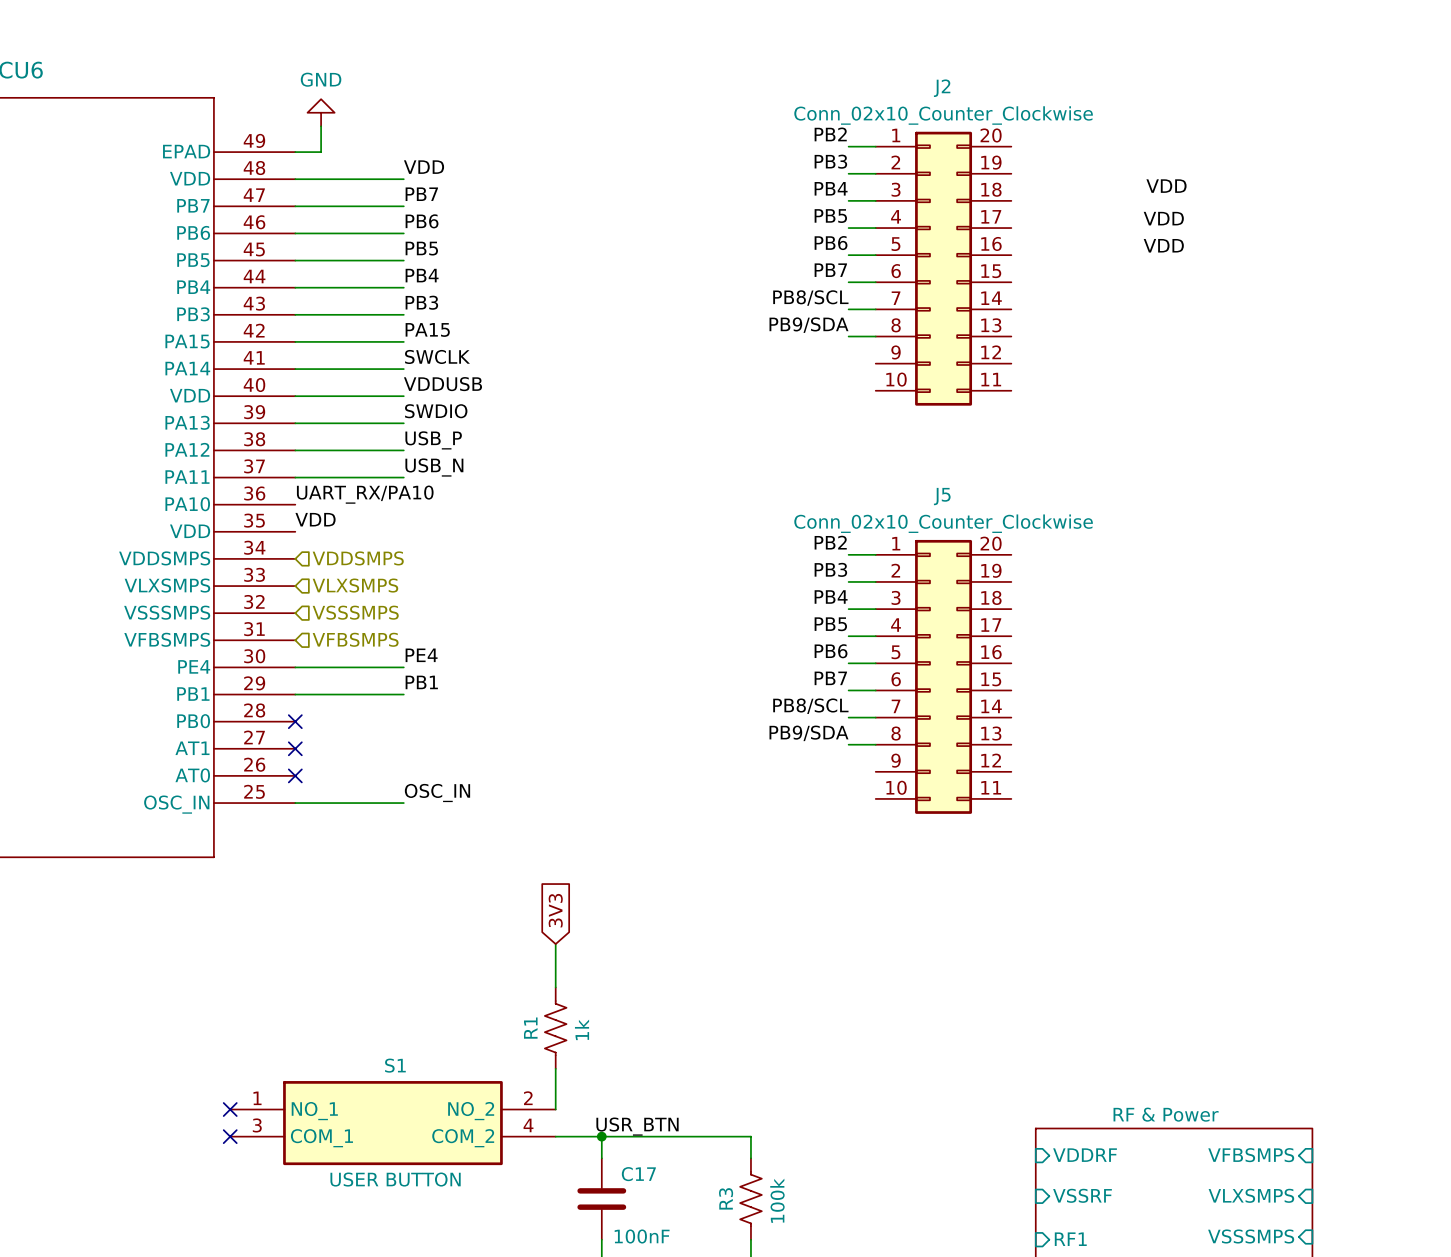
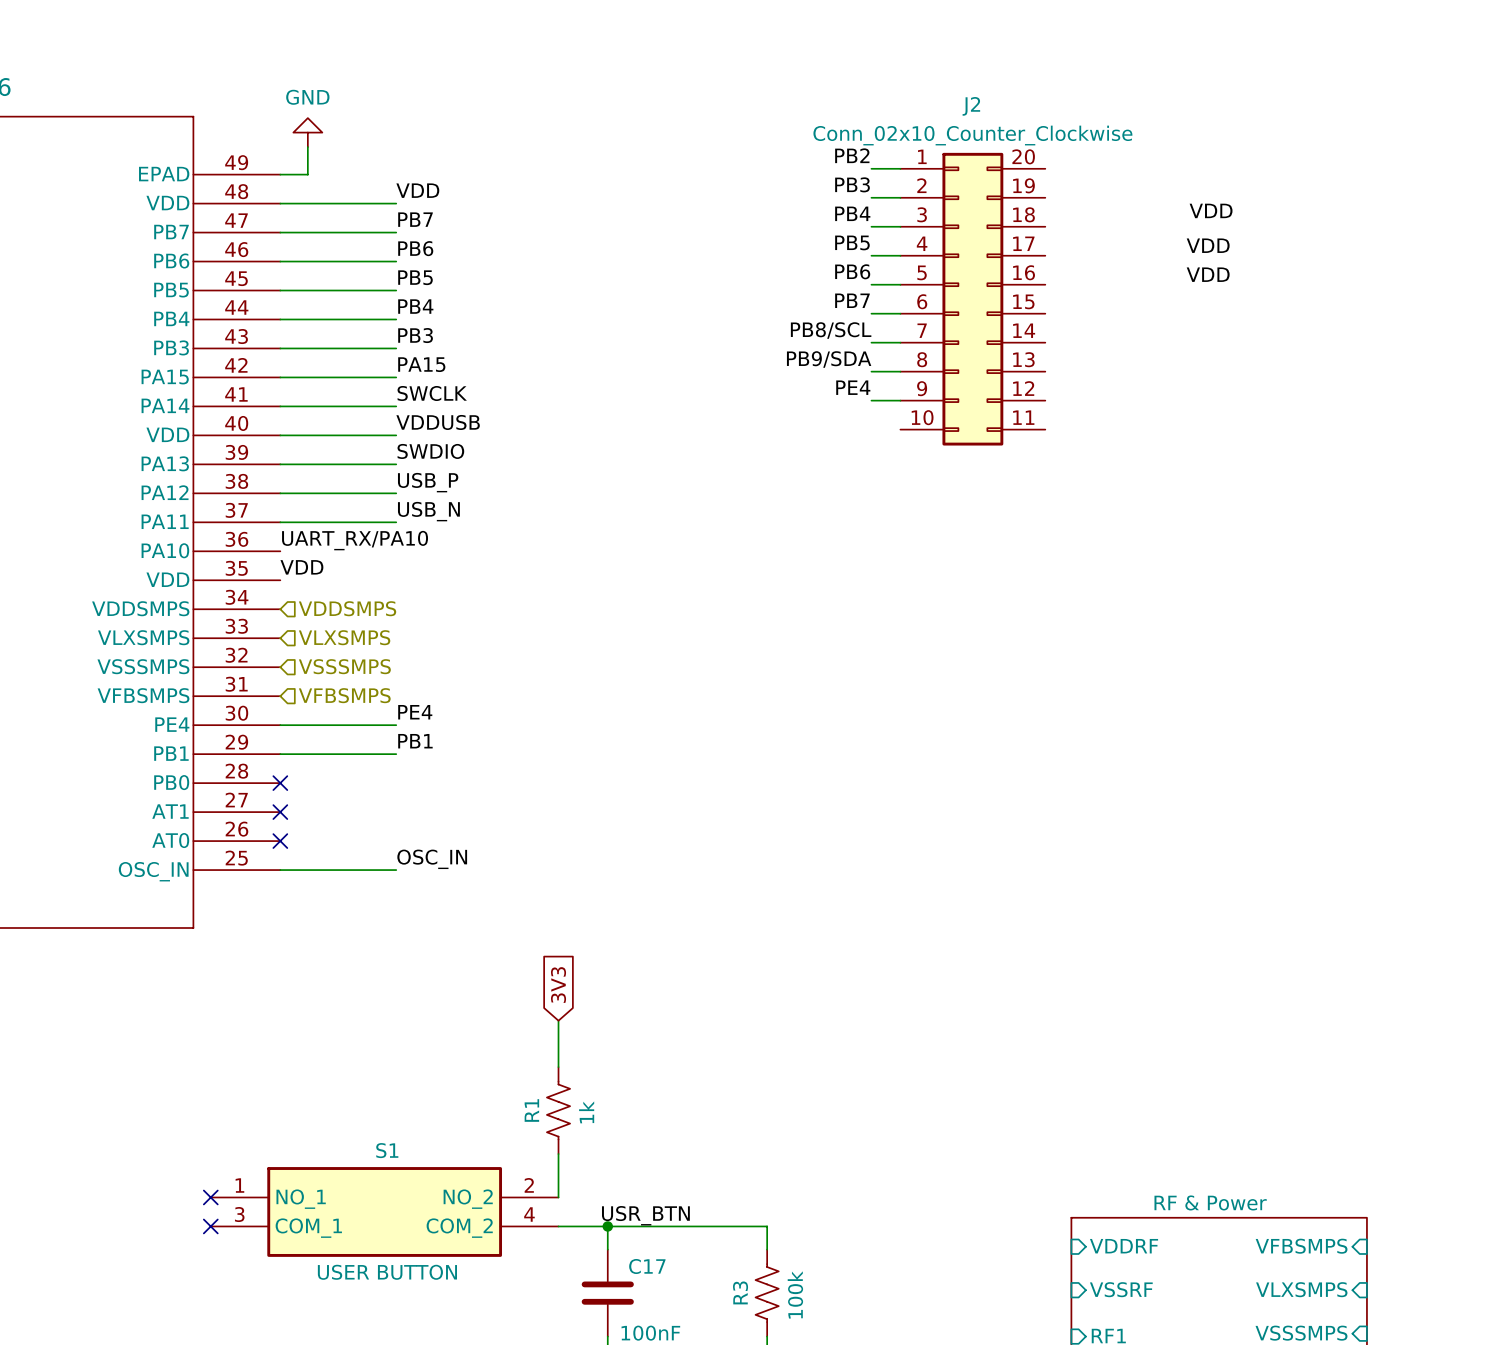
label: none -> PE4 (853, 387)
label: PB2 (830, 542) -> none
wire: (848, 554) (875, 554) -> (871, 400) (900, 400)
label: PB3 (830, 569) -> none
wire: (848, 581) (875, 581) -> none
label: PB4 (831, 597) -> none
wire: (848, 609) (875, 609) -> none
label: PB5 (830, 624) -> none
wire: (848, 636) (875, 636) -> none
label: PB6 (831, 651) -> none
wire: (848, 663) (875, 663) -> none
J5: Conn_02x10_Counter_Clockwise (943, 676) -> none
label: PB7 (830, 678) -> none
wire: (848, 690) (875, 690) -> none
label: PB8/SCL (810, 706) -> none
wire: (848, 717) (875, 717) -> none
label: PB9/SDA (808, 733) -> none
wire: (848, 744) (875, 744) -> none

